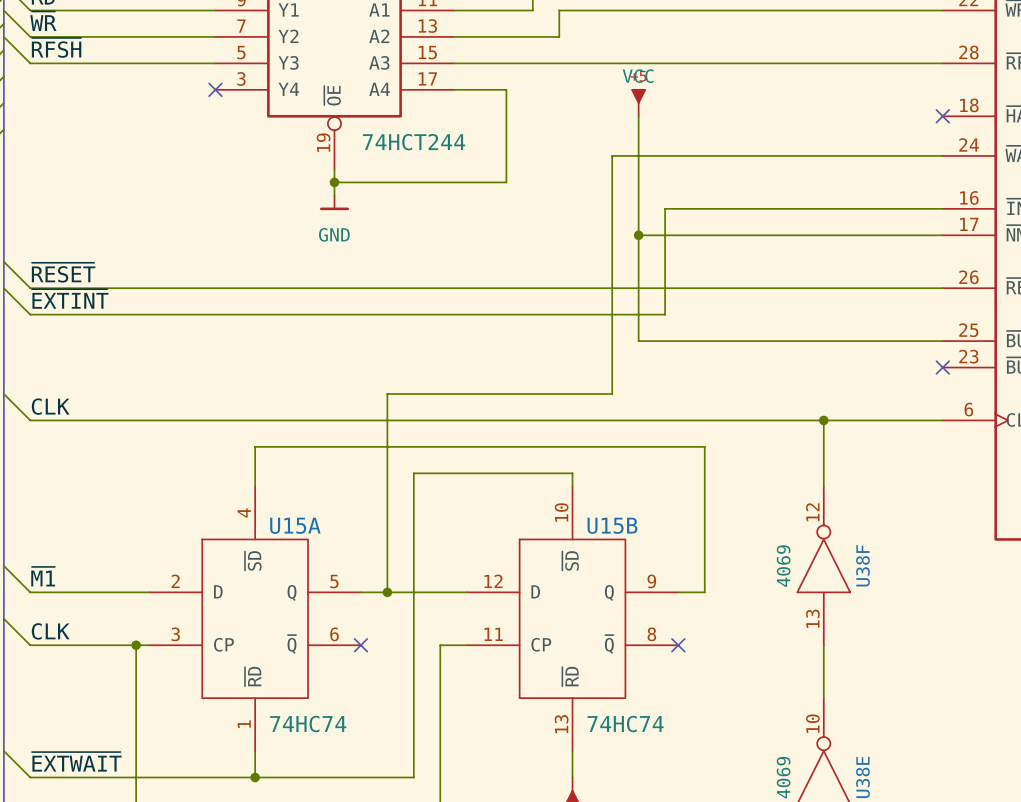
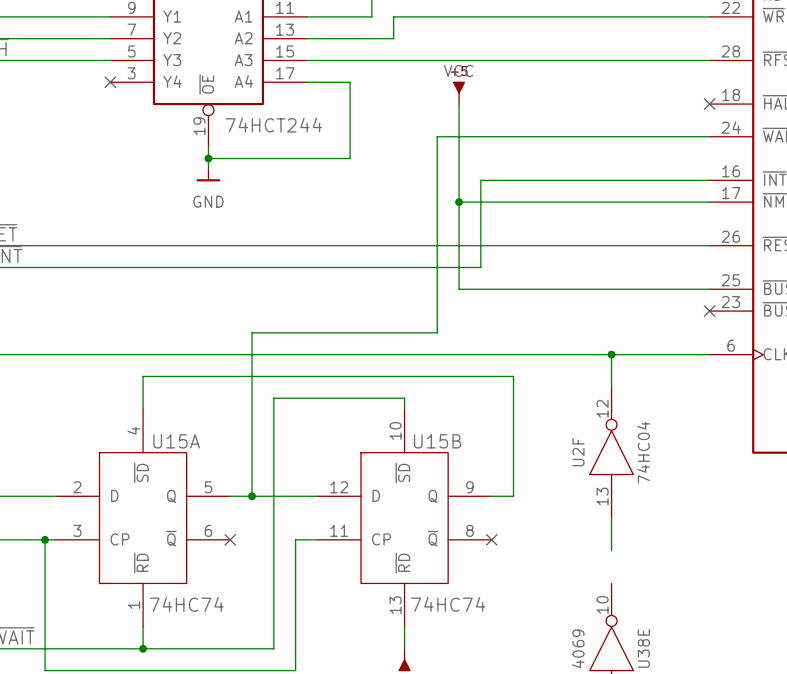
U2F: none -> 74HC04 (611, 452)
U38F: 4069 (823, 565) -> none
wire: (823, 658) (823, 698) -> none

